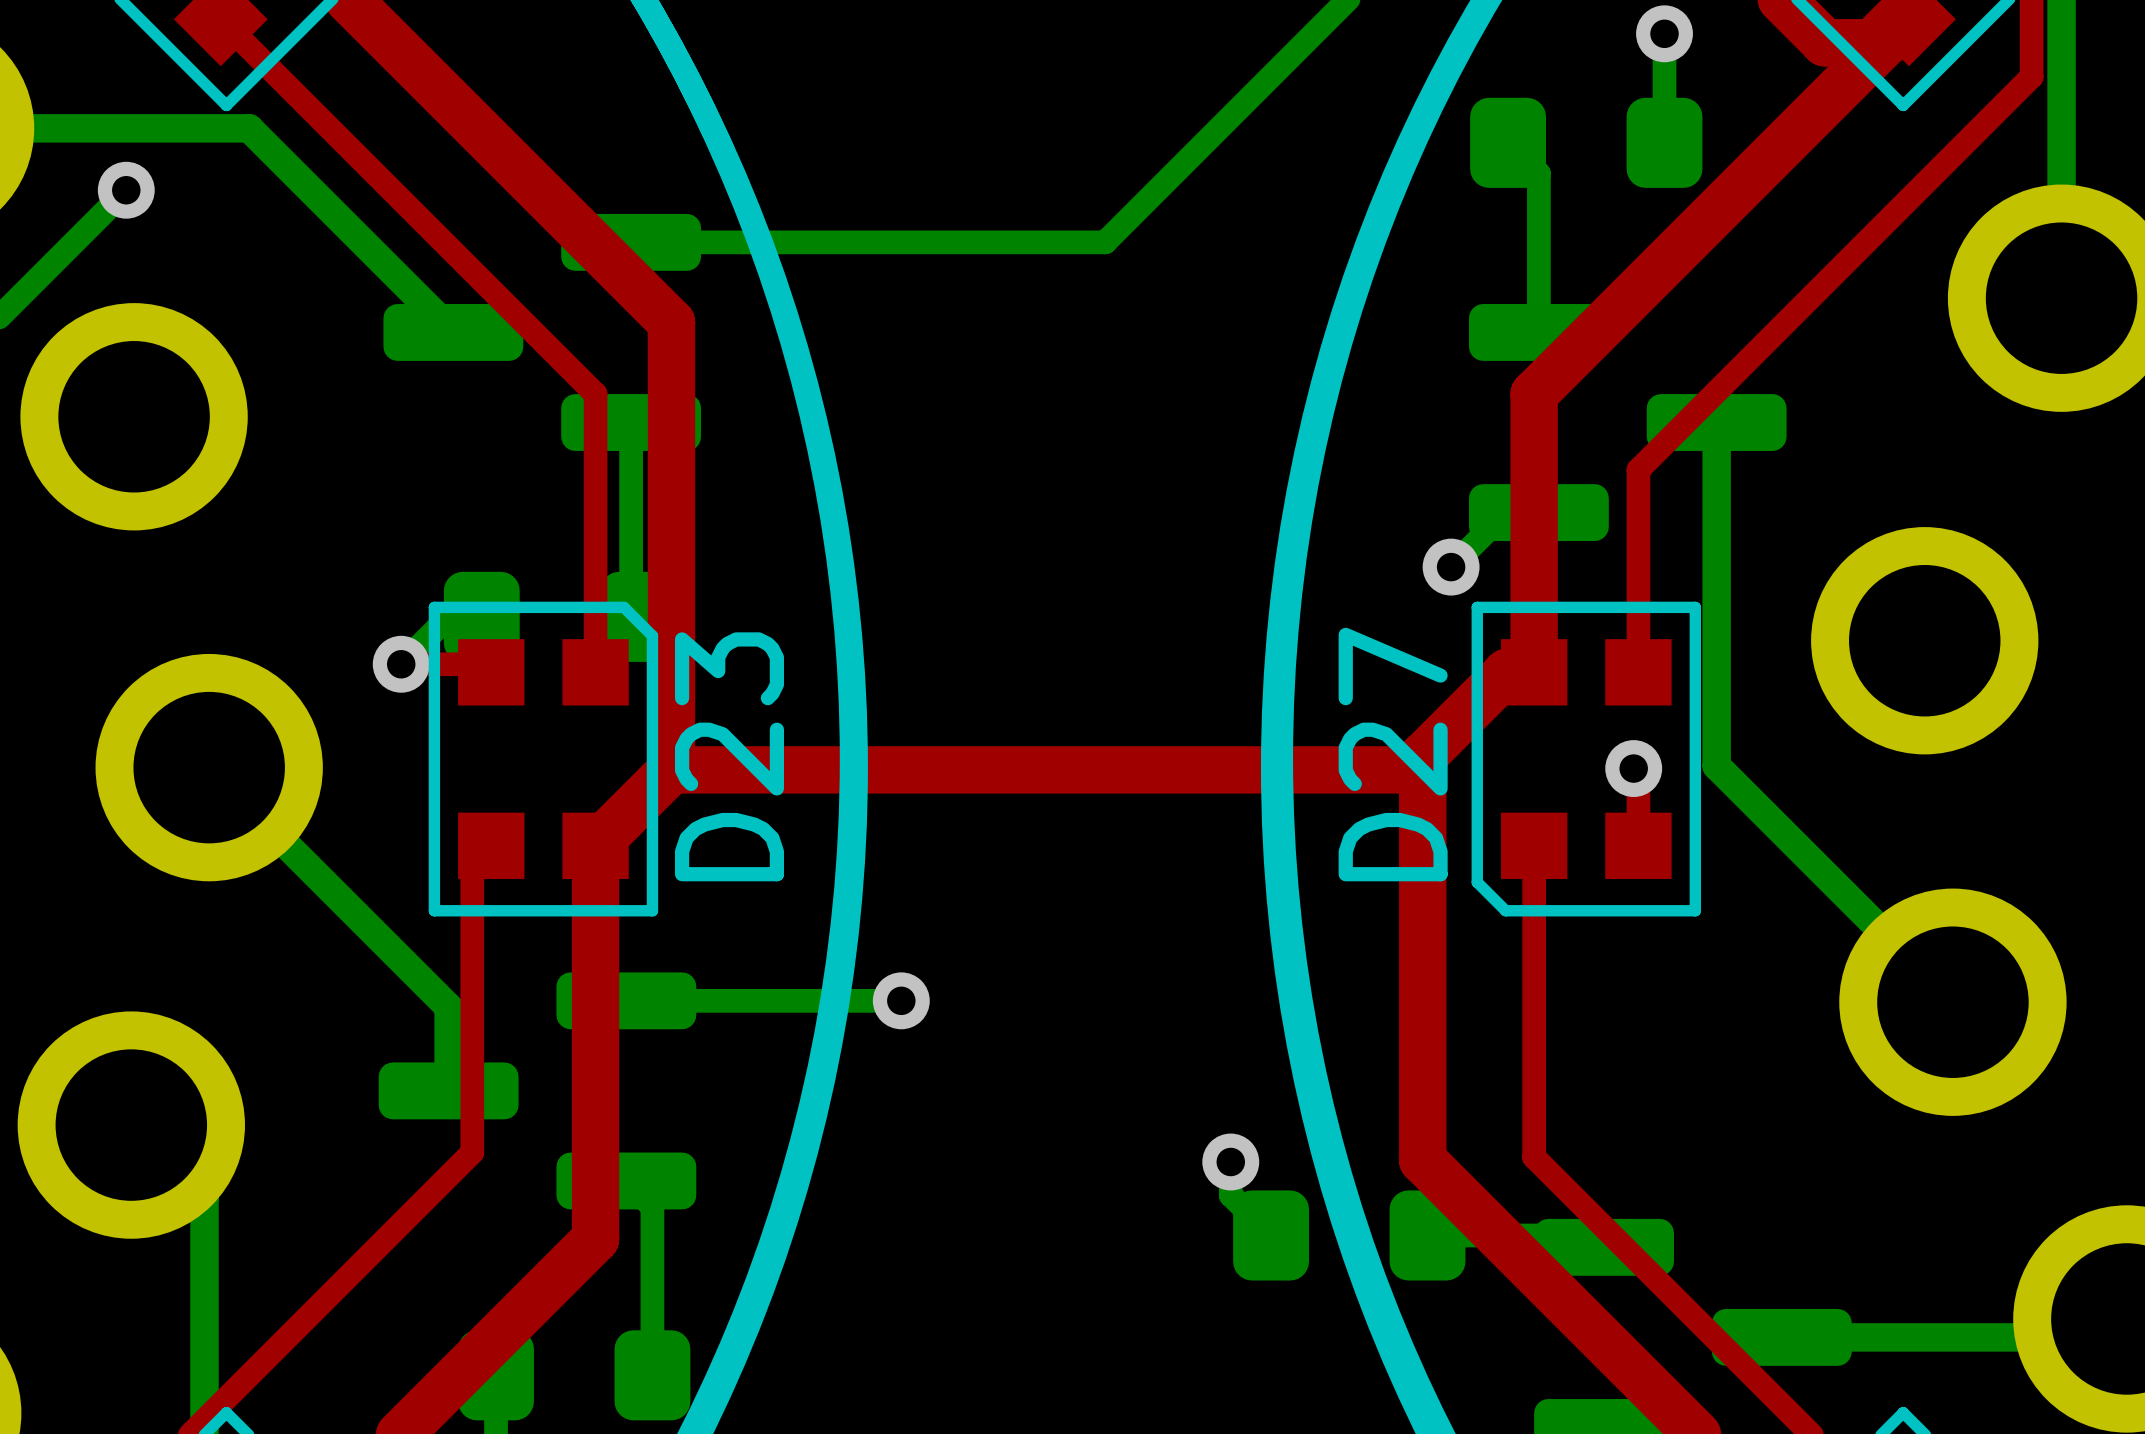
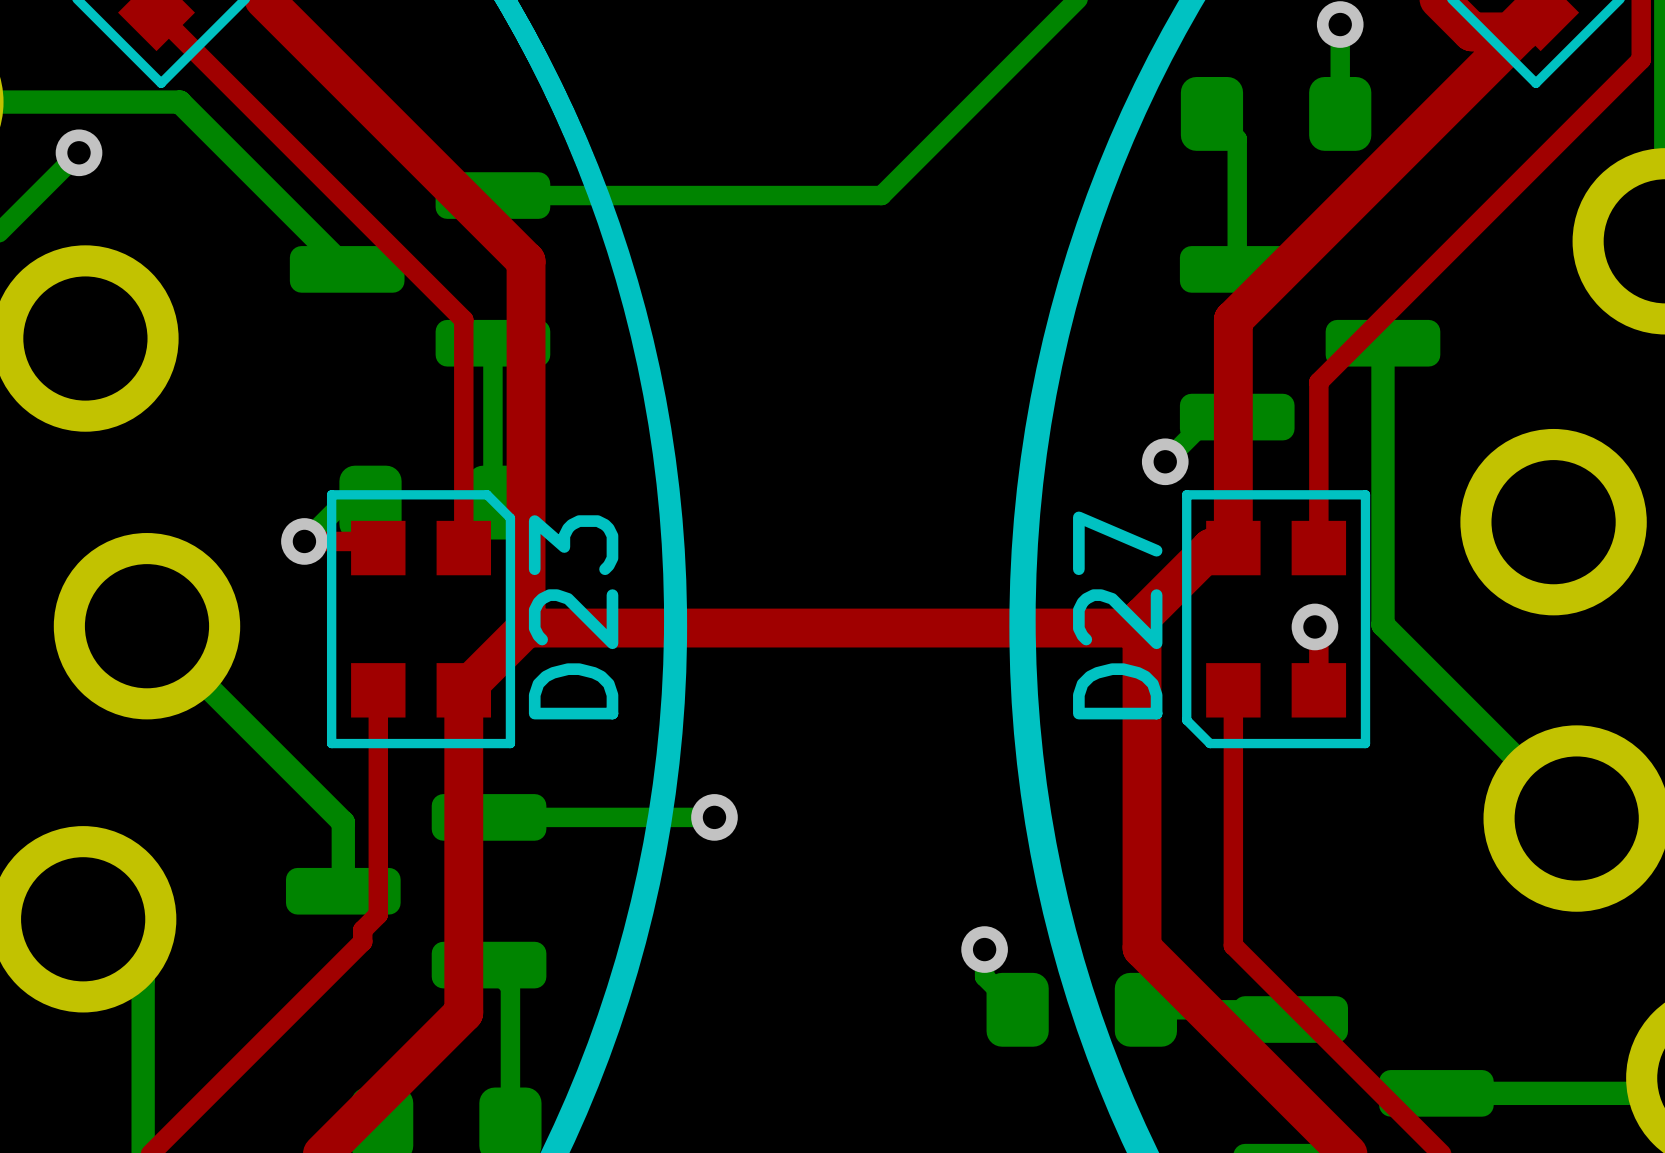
top track: (491, 845) (472, 864) (472, 1138) -> (378, 690) (378, 914) (362, 930)

